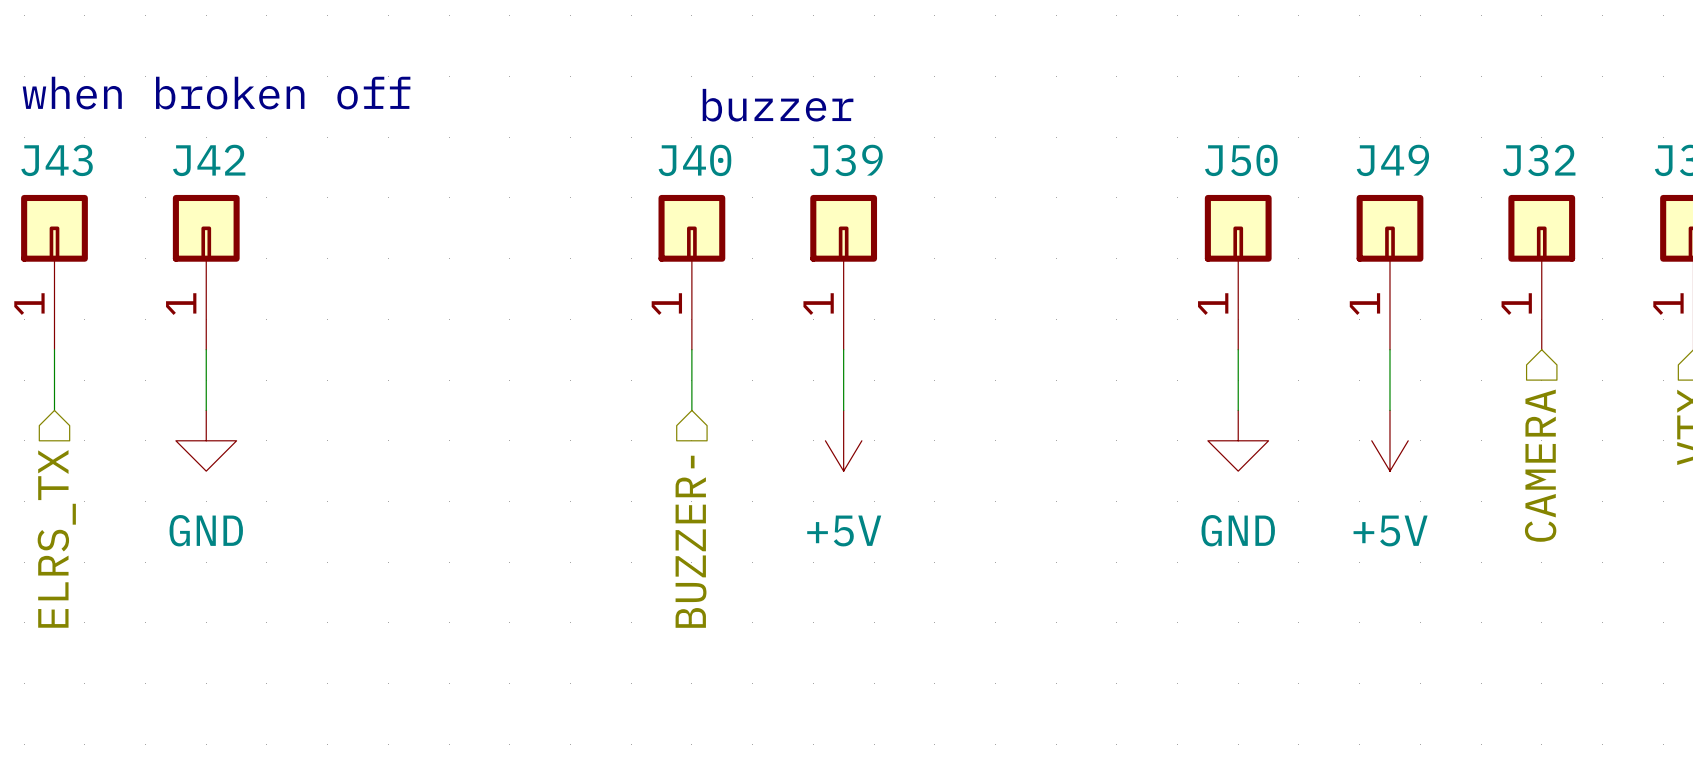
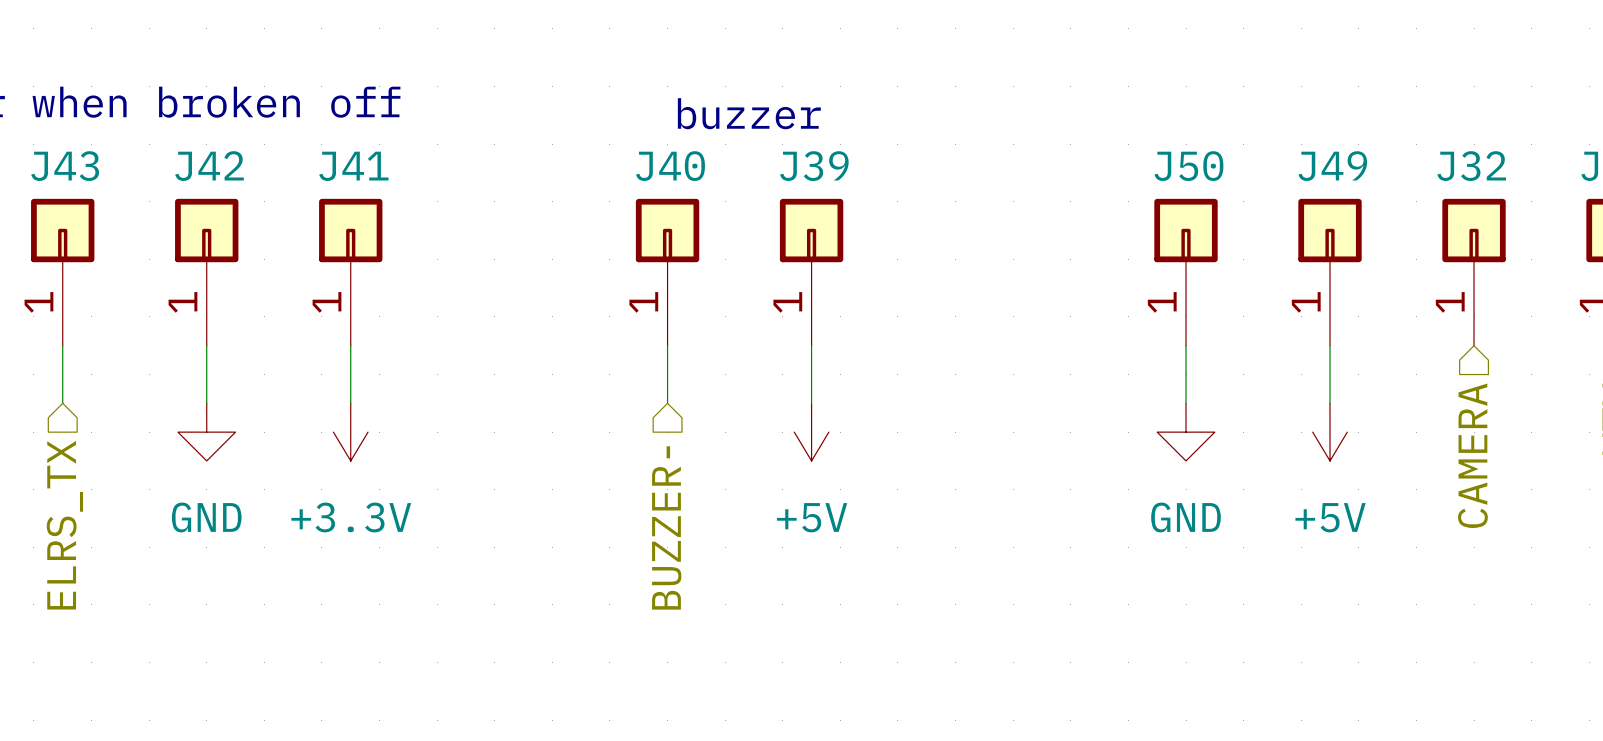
J41: none -> (350, 272)
wire: none -> (350, 345) (350, 403)
power symbol: none -> +3.3V (350, 432)

